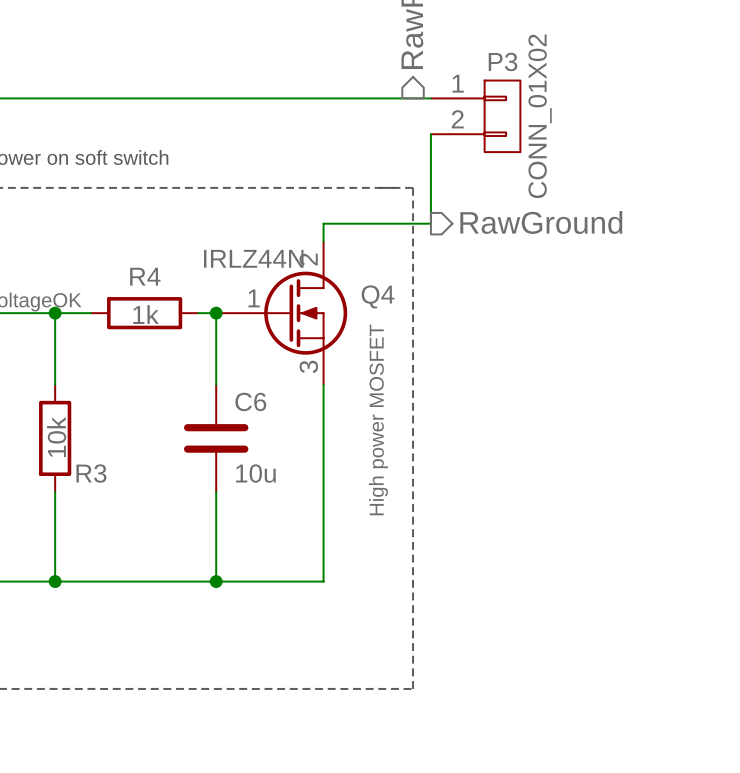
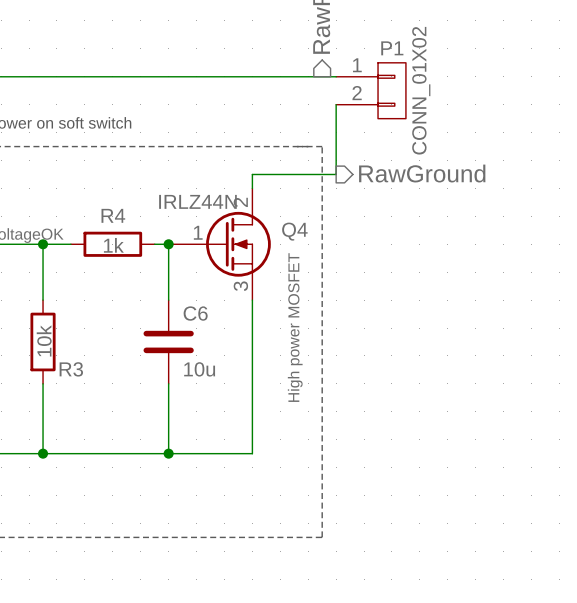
P3 name: P3 (503, 61) -> P1 (392, 48)

